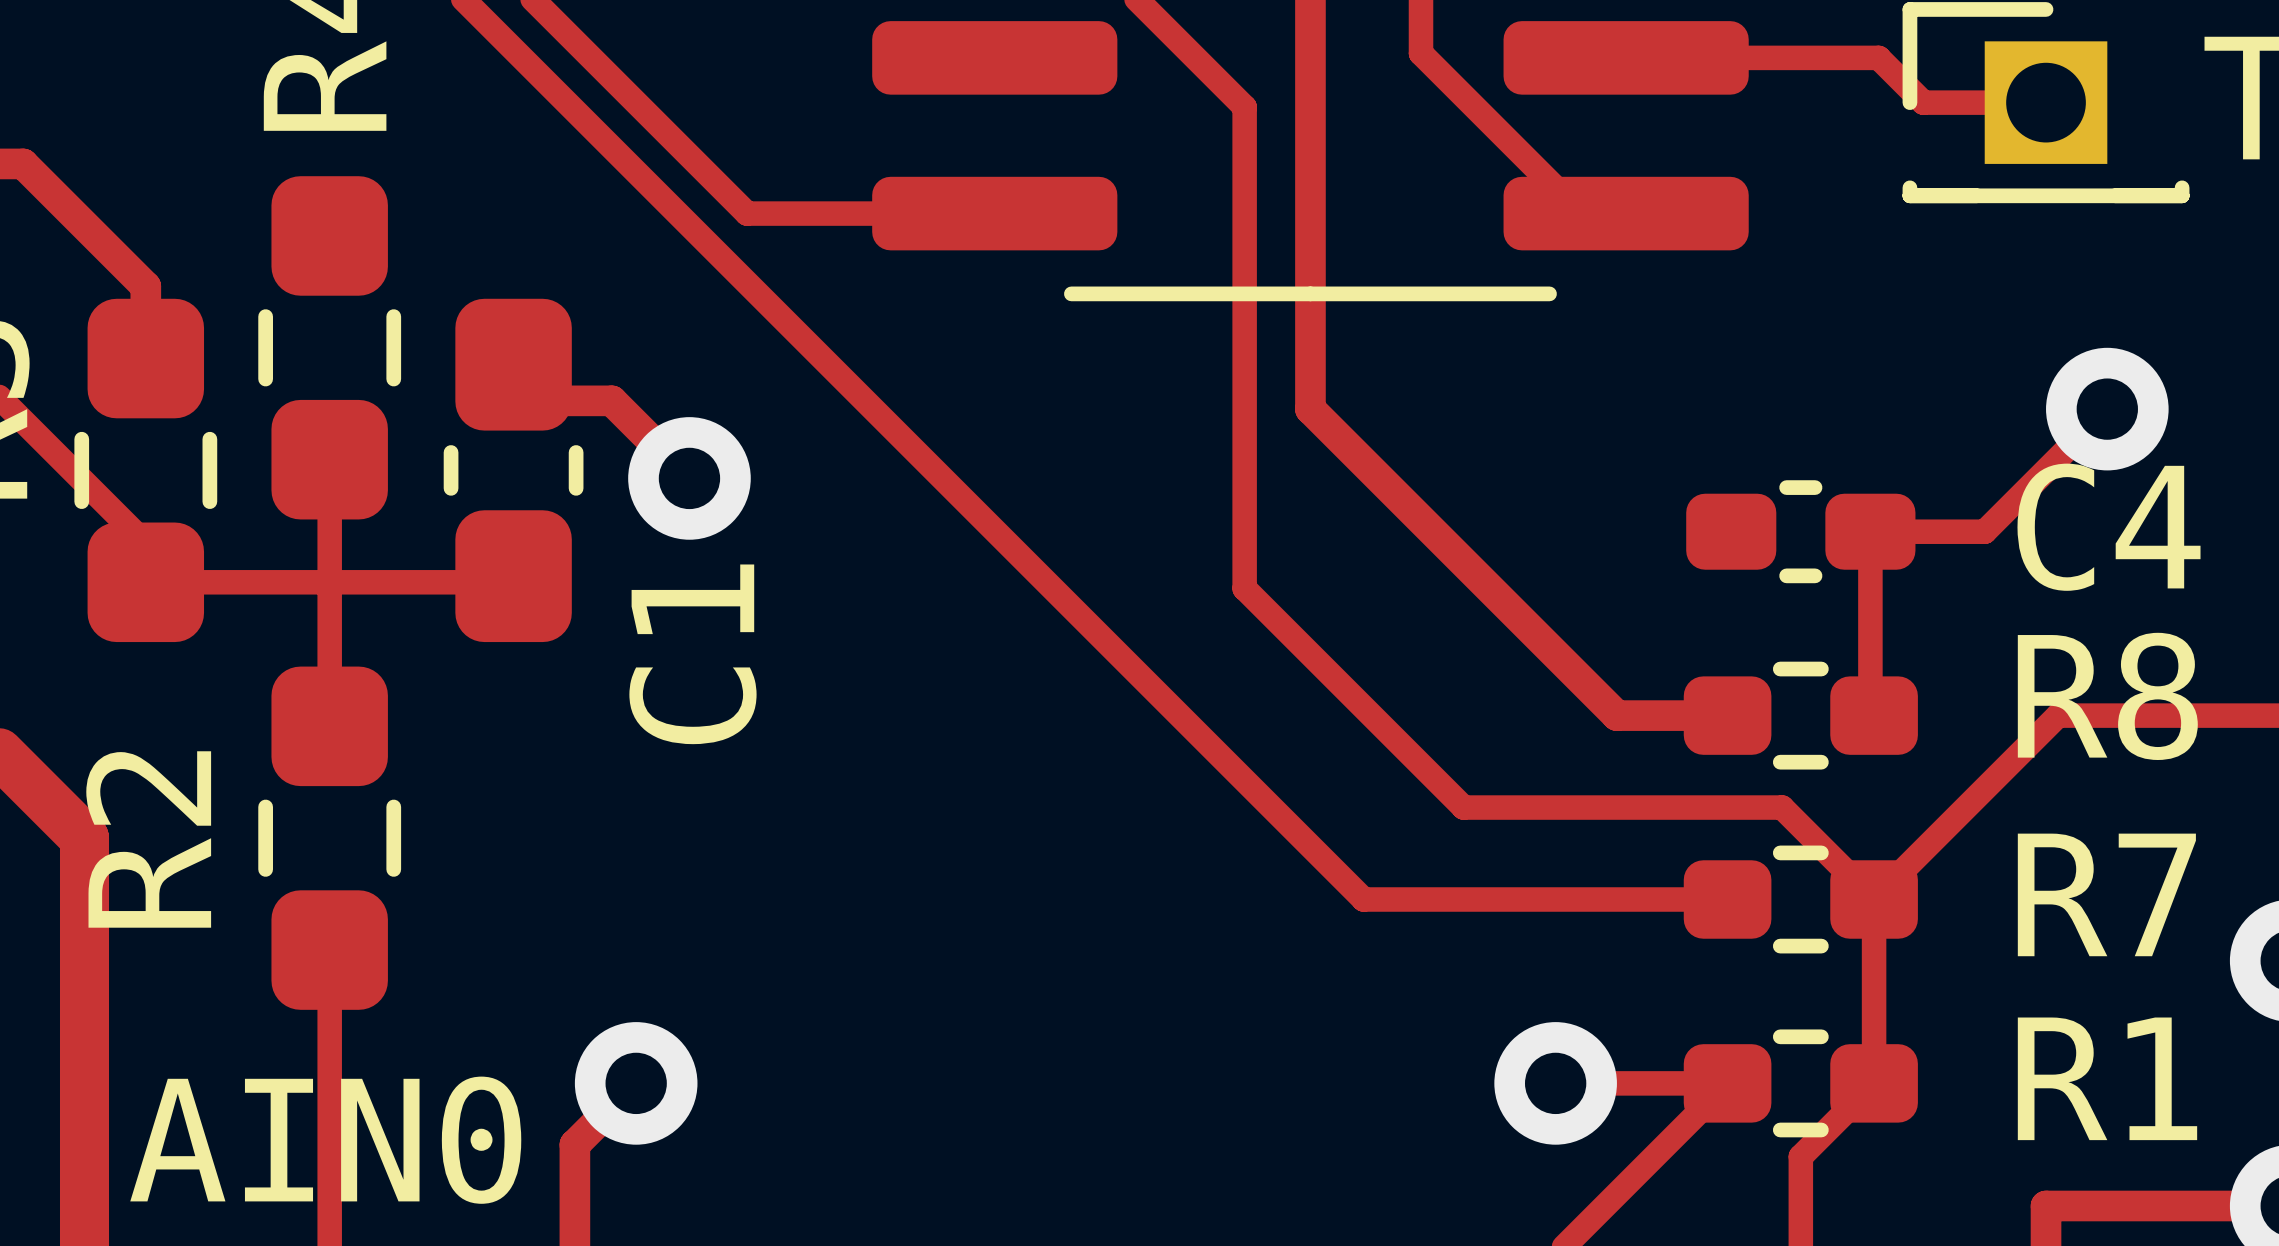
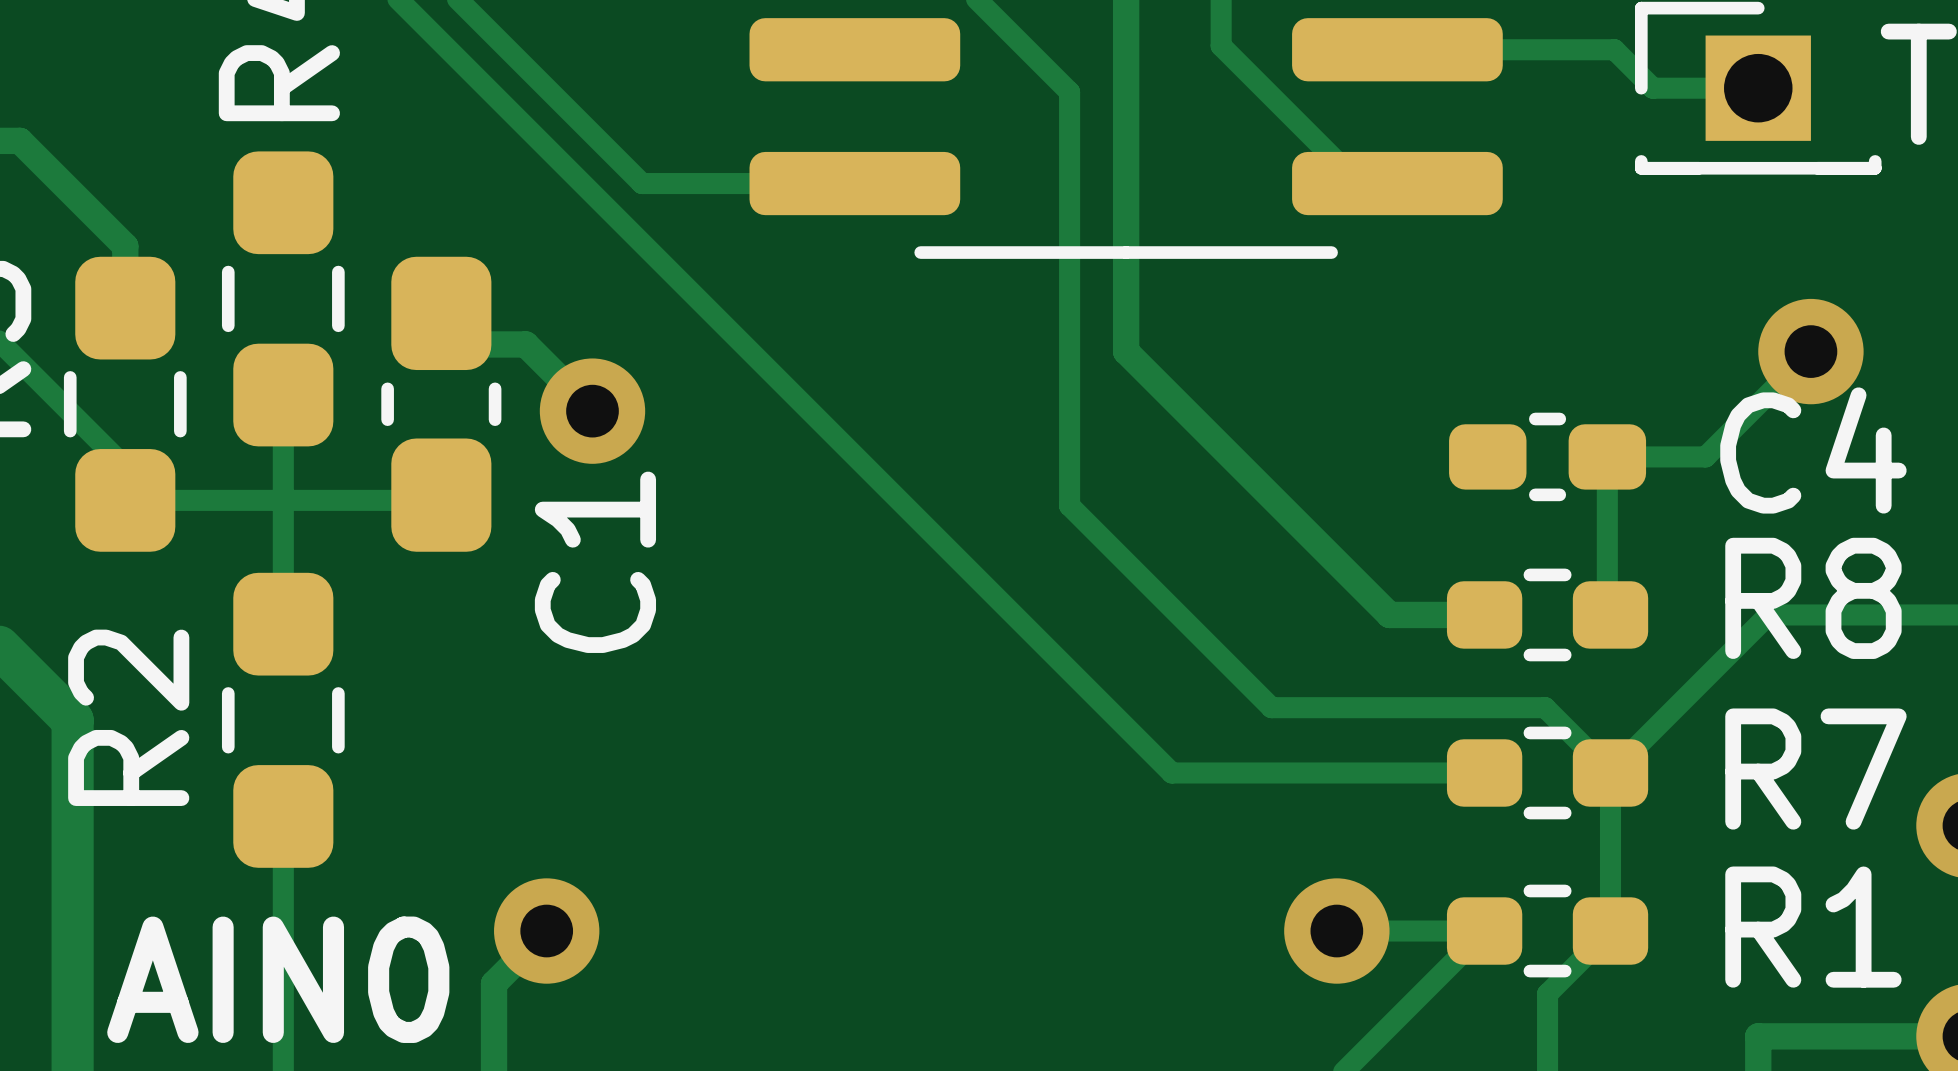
track: (1463, 807) (1782, 807) (1798, 823) -> (1257, 693) (1271, 707) (1545, 707)

